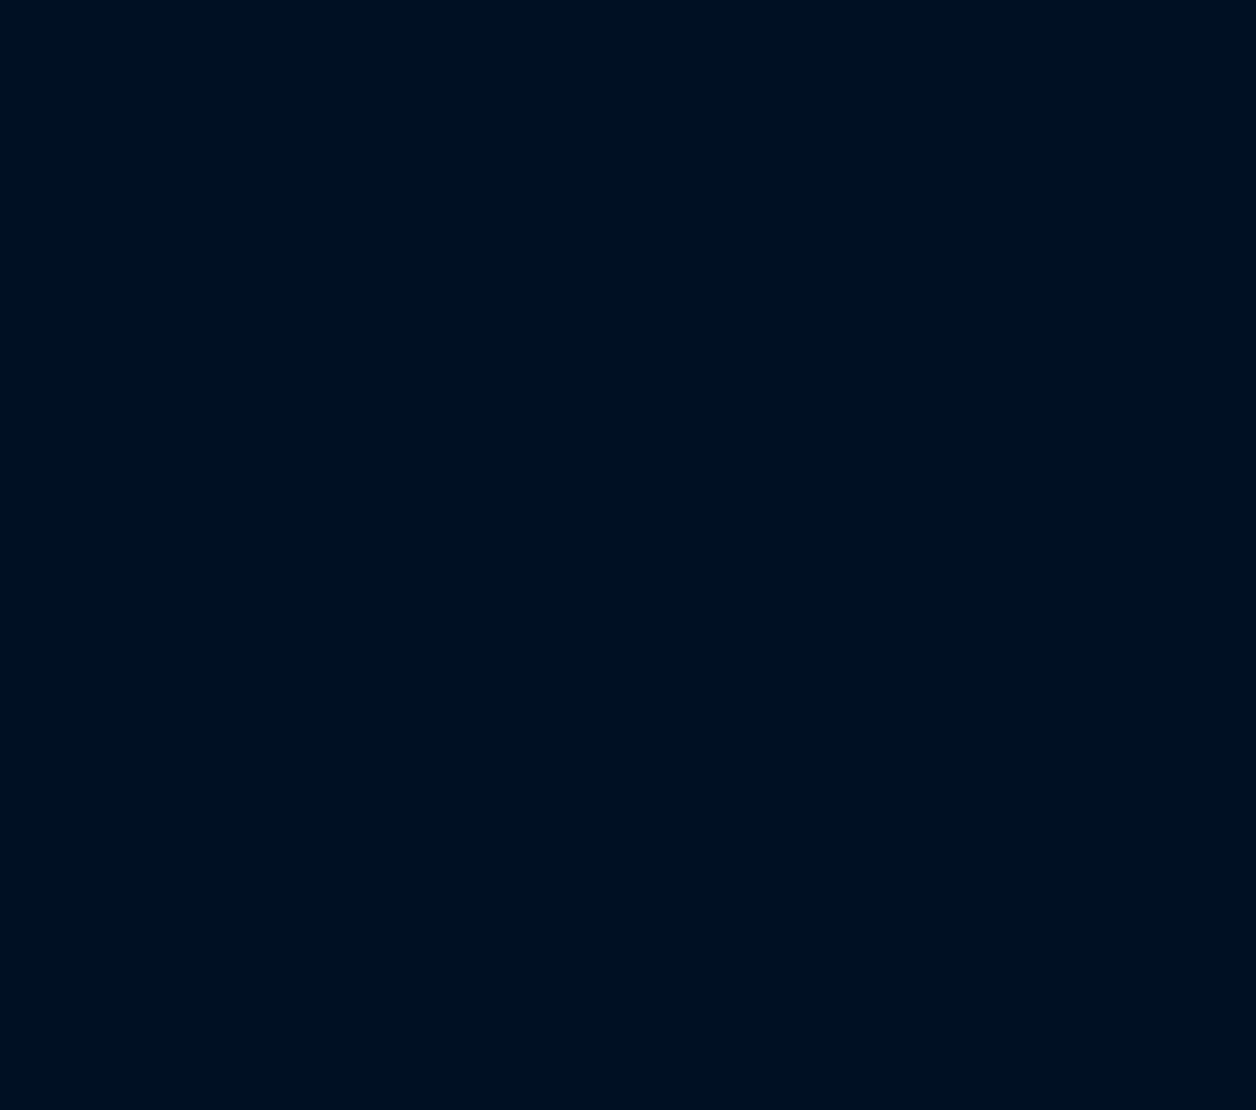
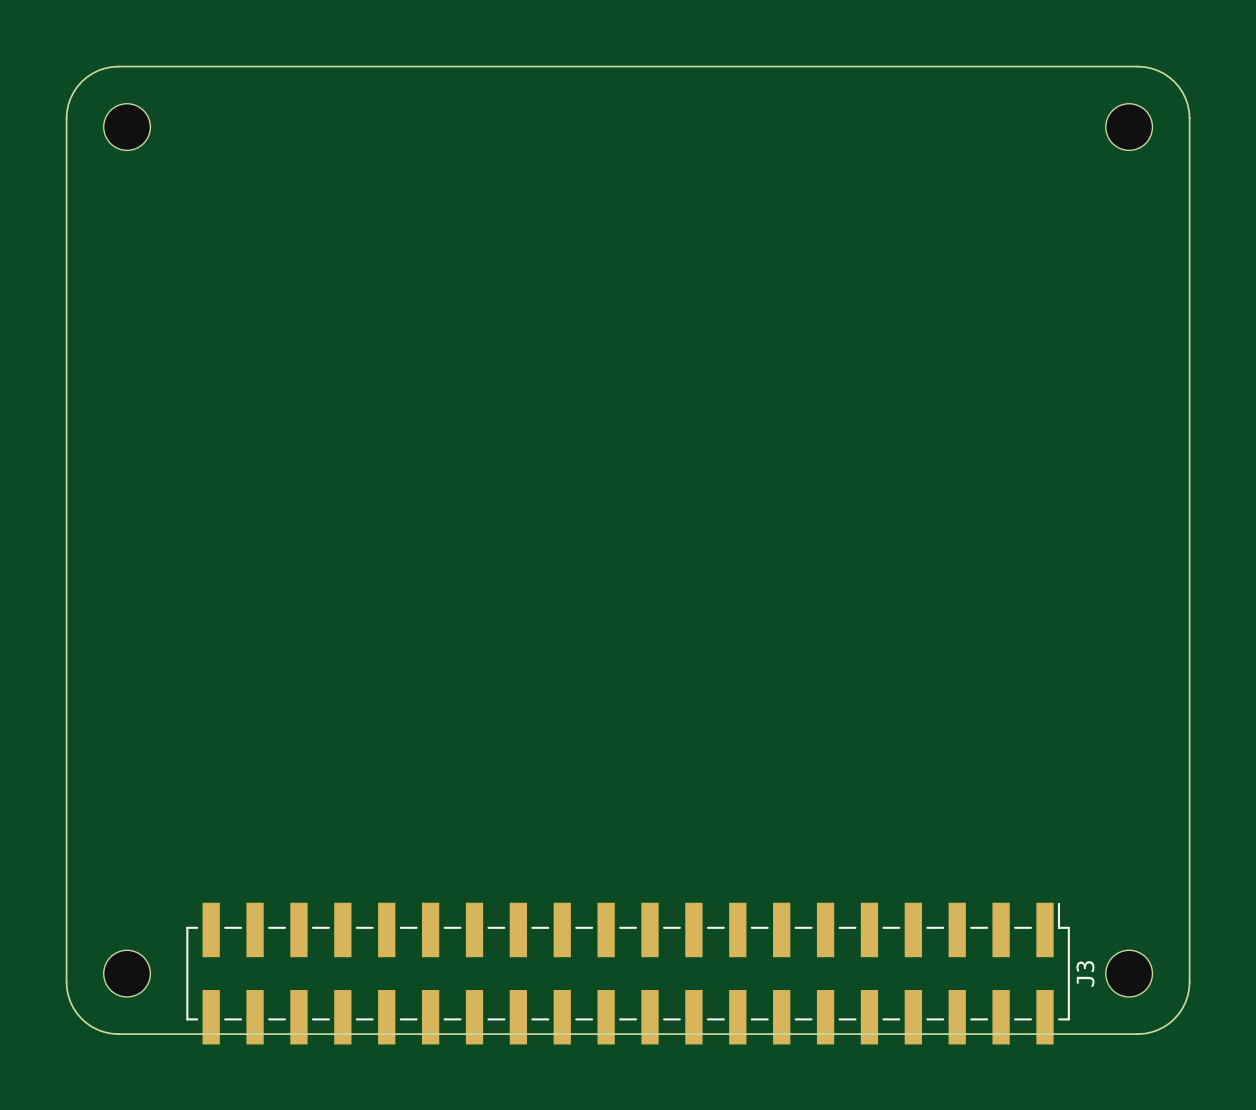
board edge: none -> (1189, 118) (1189, 982) (1185, 1002) (1178, 1013) (1169, 1023) (1157, 1030) (1137, 1034) (118, 1034) (104, 1032) (92, 1027) (77, 1013) (70, 1002) (66, 982) (66, 118) (70, 98) (77, 86) (86, 77) (98, 70) (118, 66) (1137, 66) (1157, 70) (1174, 81) (1185, 98) (1187, 104) (1189, 111) (1189, 118)
part: none -> (127, 127)
part: none -> (1129, 127)
part: none -> (127, 973)
J3: none -> (628, 973)
part: none -> (1129, 973)

